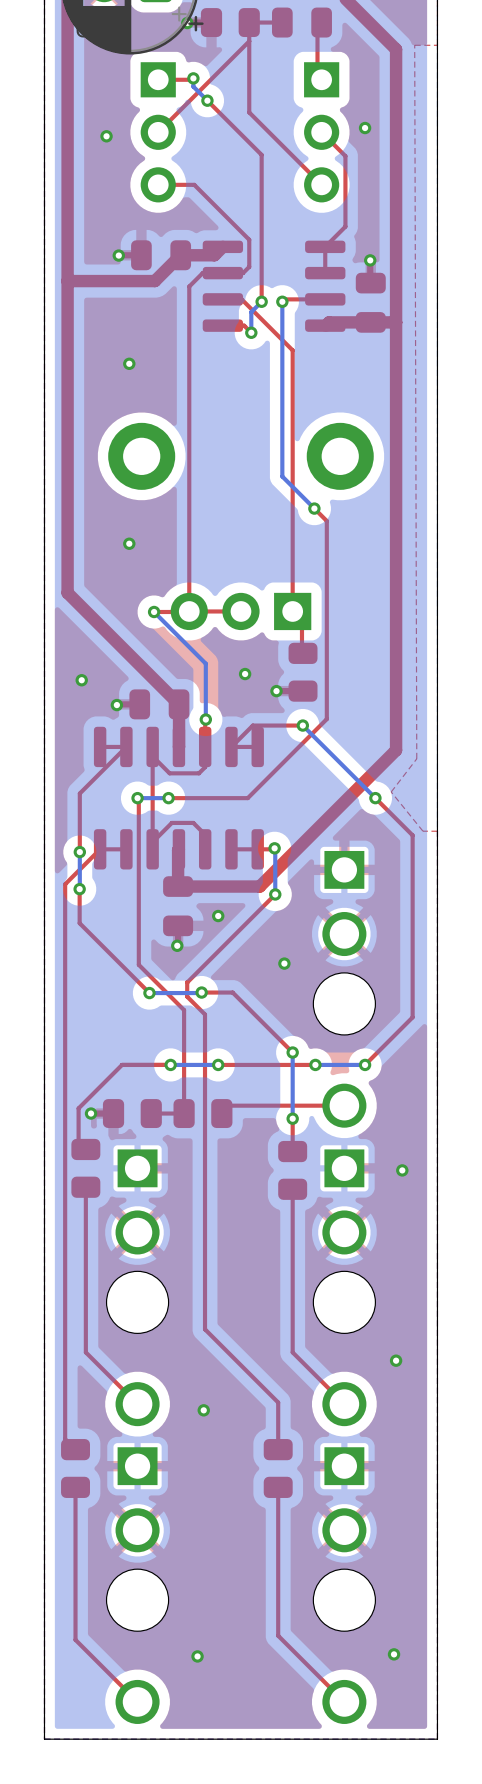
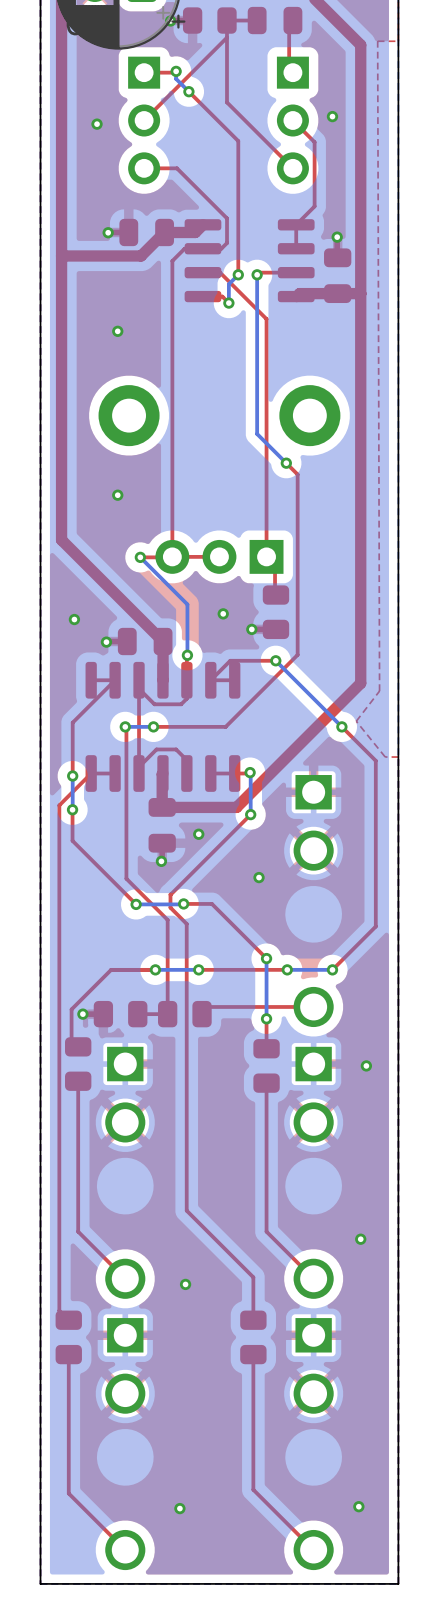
part: (344, 1003) -> none
part: (137, 1302) -> none
part: (344, 1302) -> none
part: (137, 1600) -> none
part: (344, 1600) -> none

